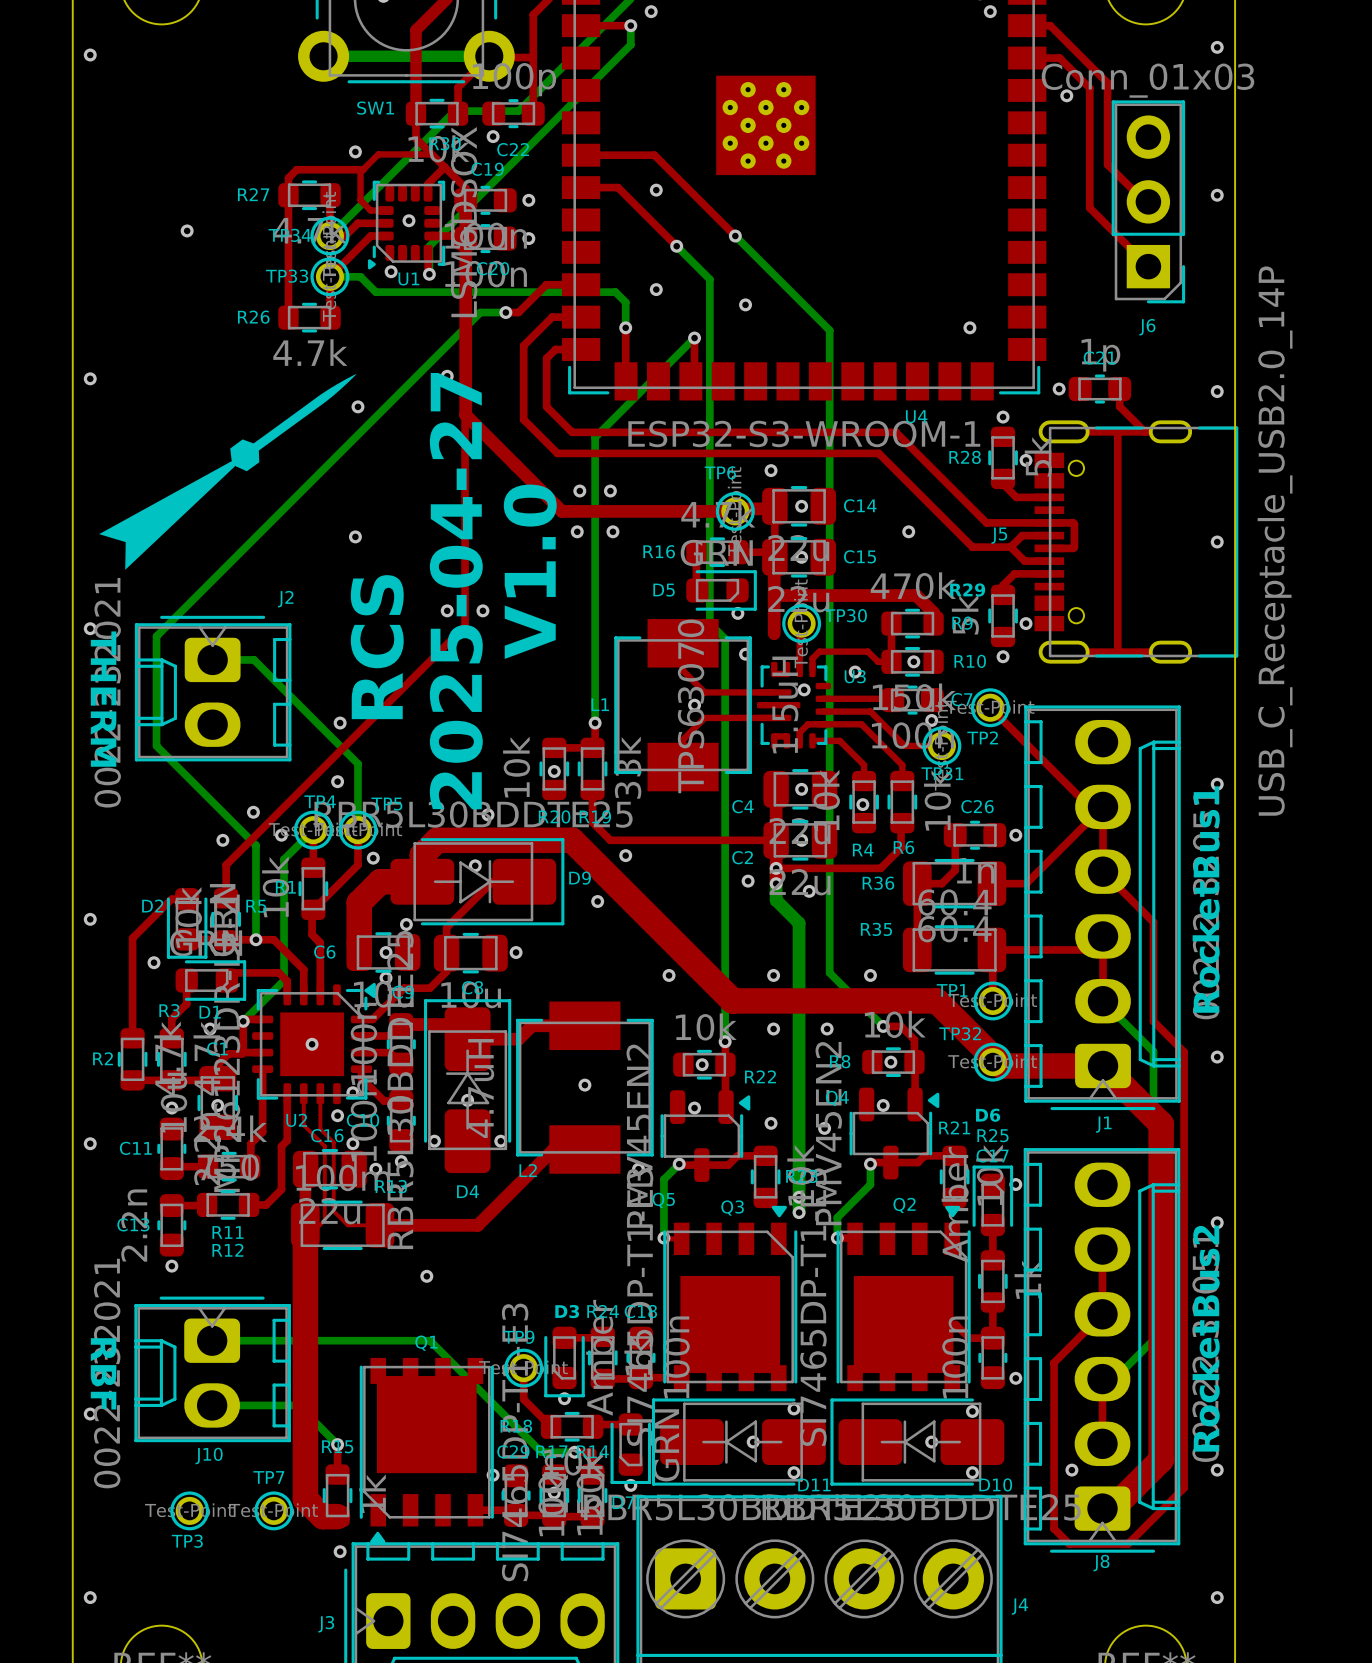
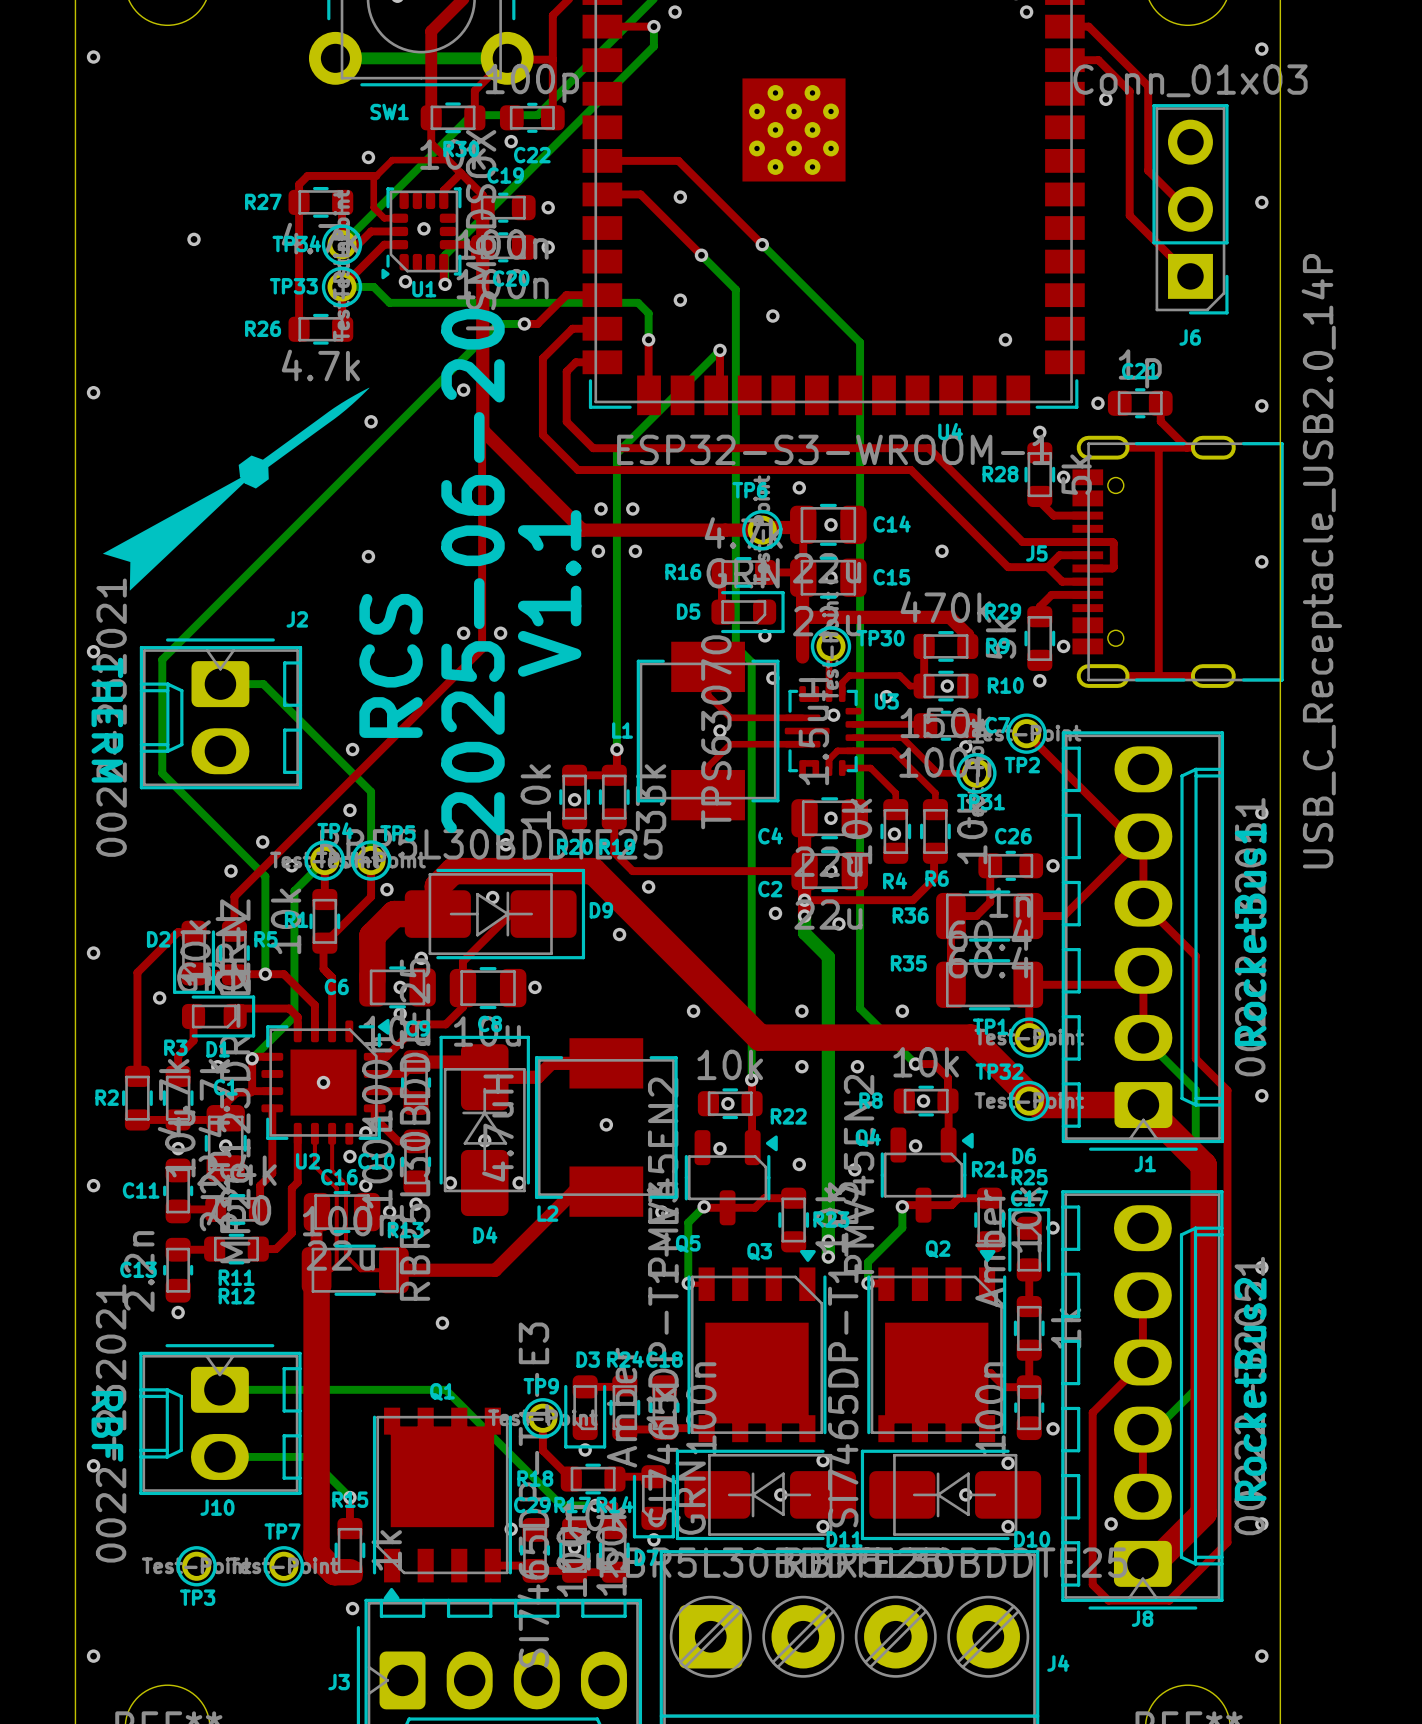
text: V1.0 (530, 571) -> V1.1 (549, 593)
text: 2025-04-27 (456, 591) -> 2025-06-20 (473, 572)

